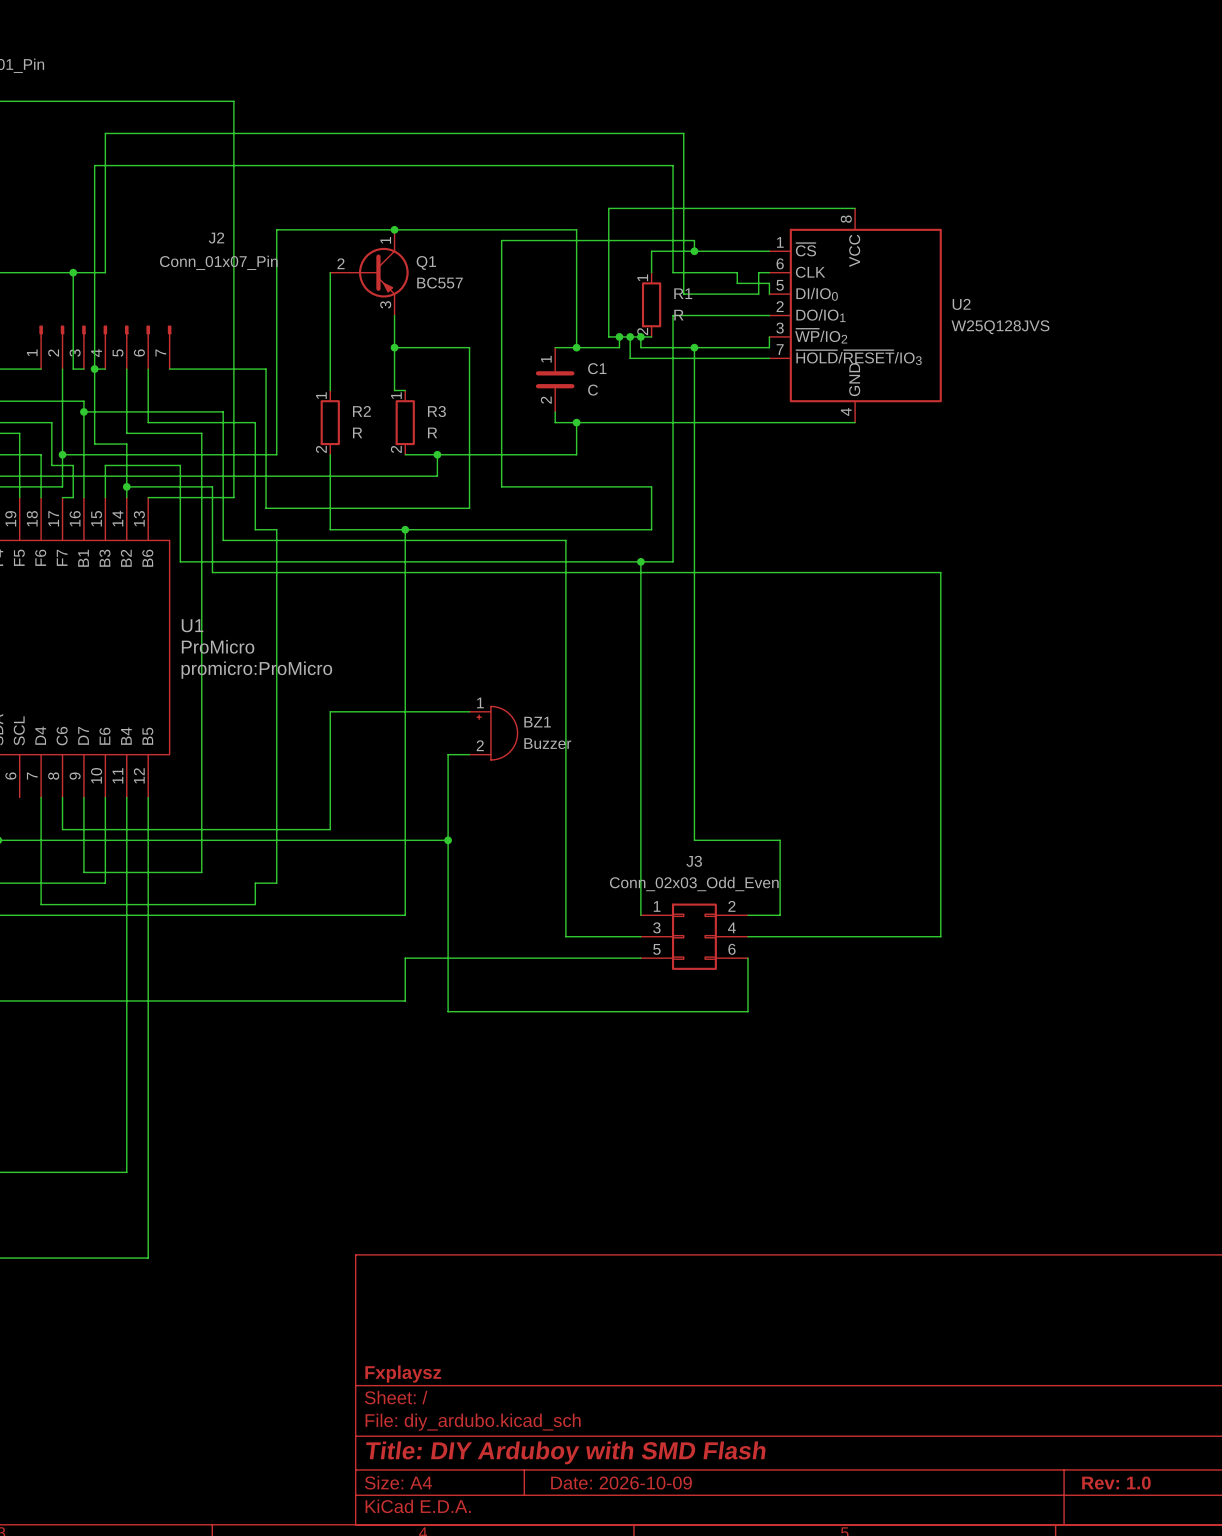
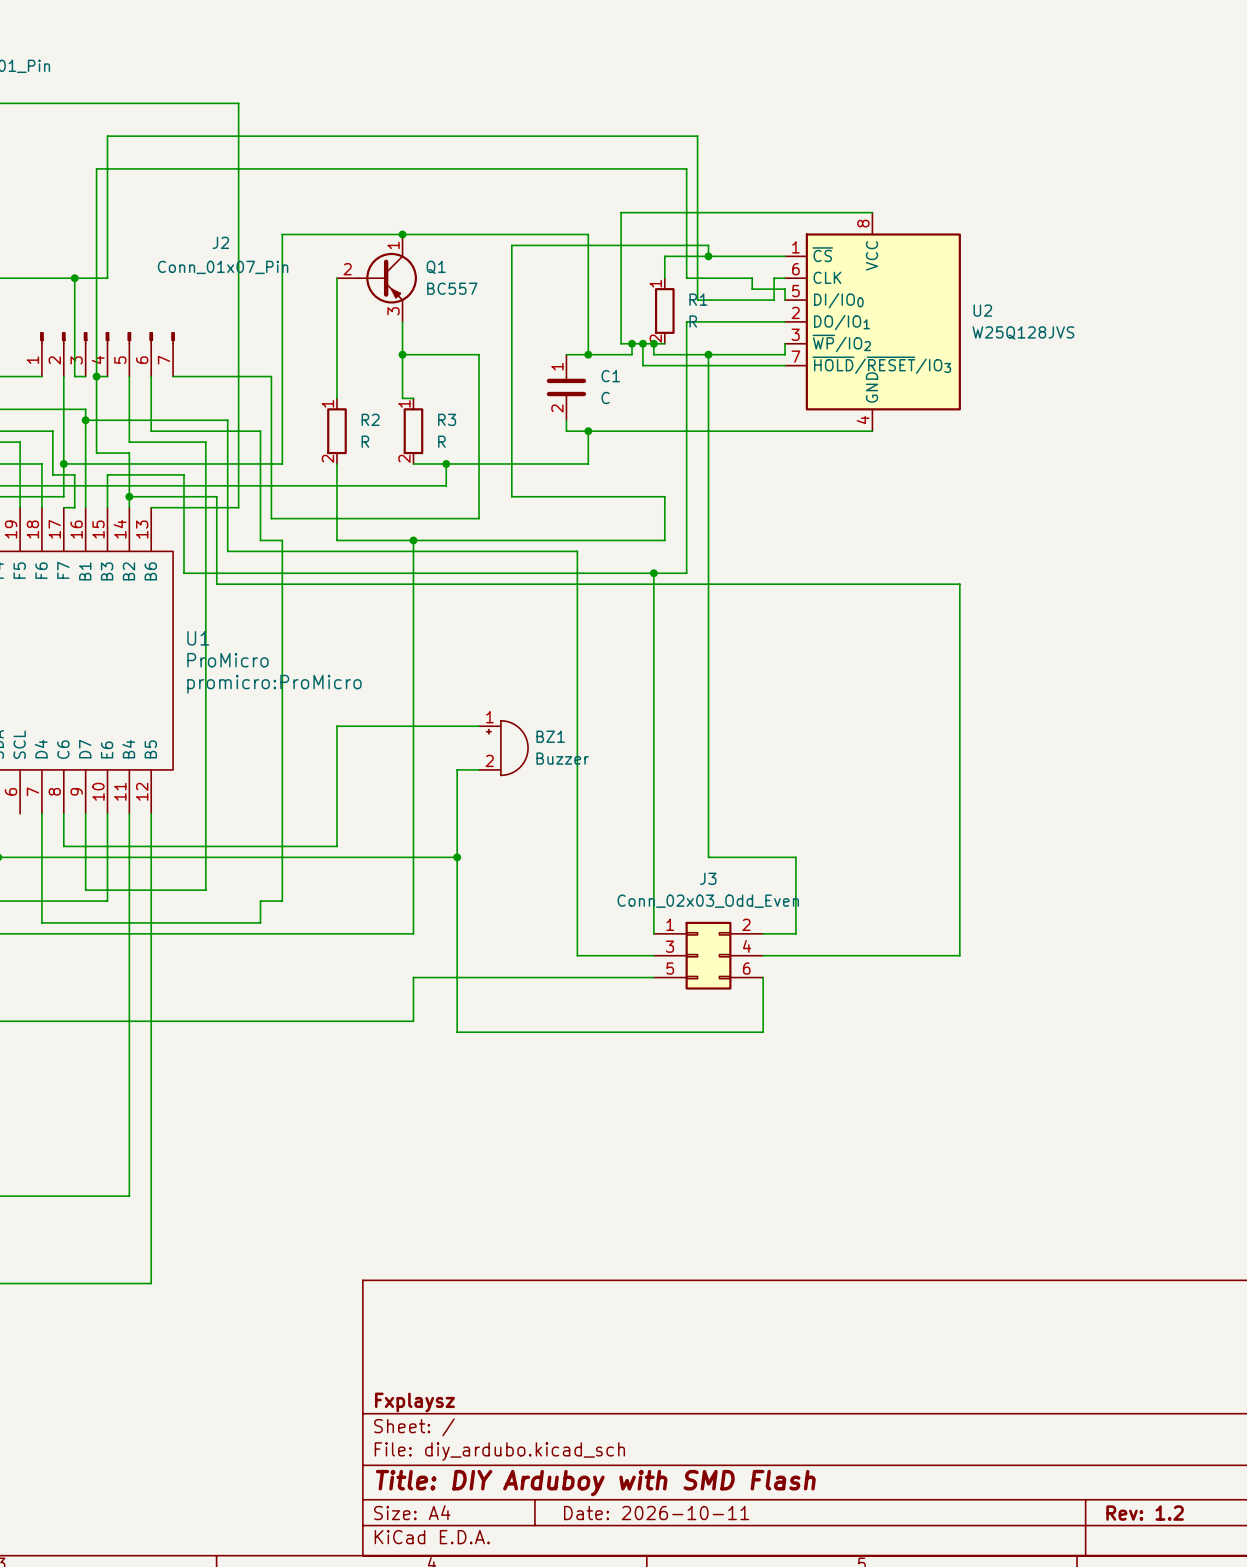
title block: Date: 2026-10-09 (621, 1482) -> Date: 2026-10-11 (656, 1513)
title block: Rev: 1.0 (1116, 1482) -> Rev: 1.2 (1145, 1513)

